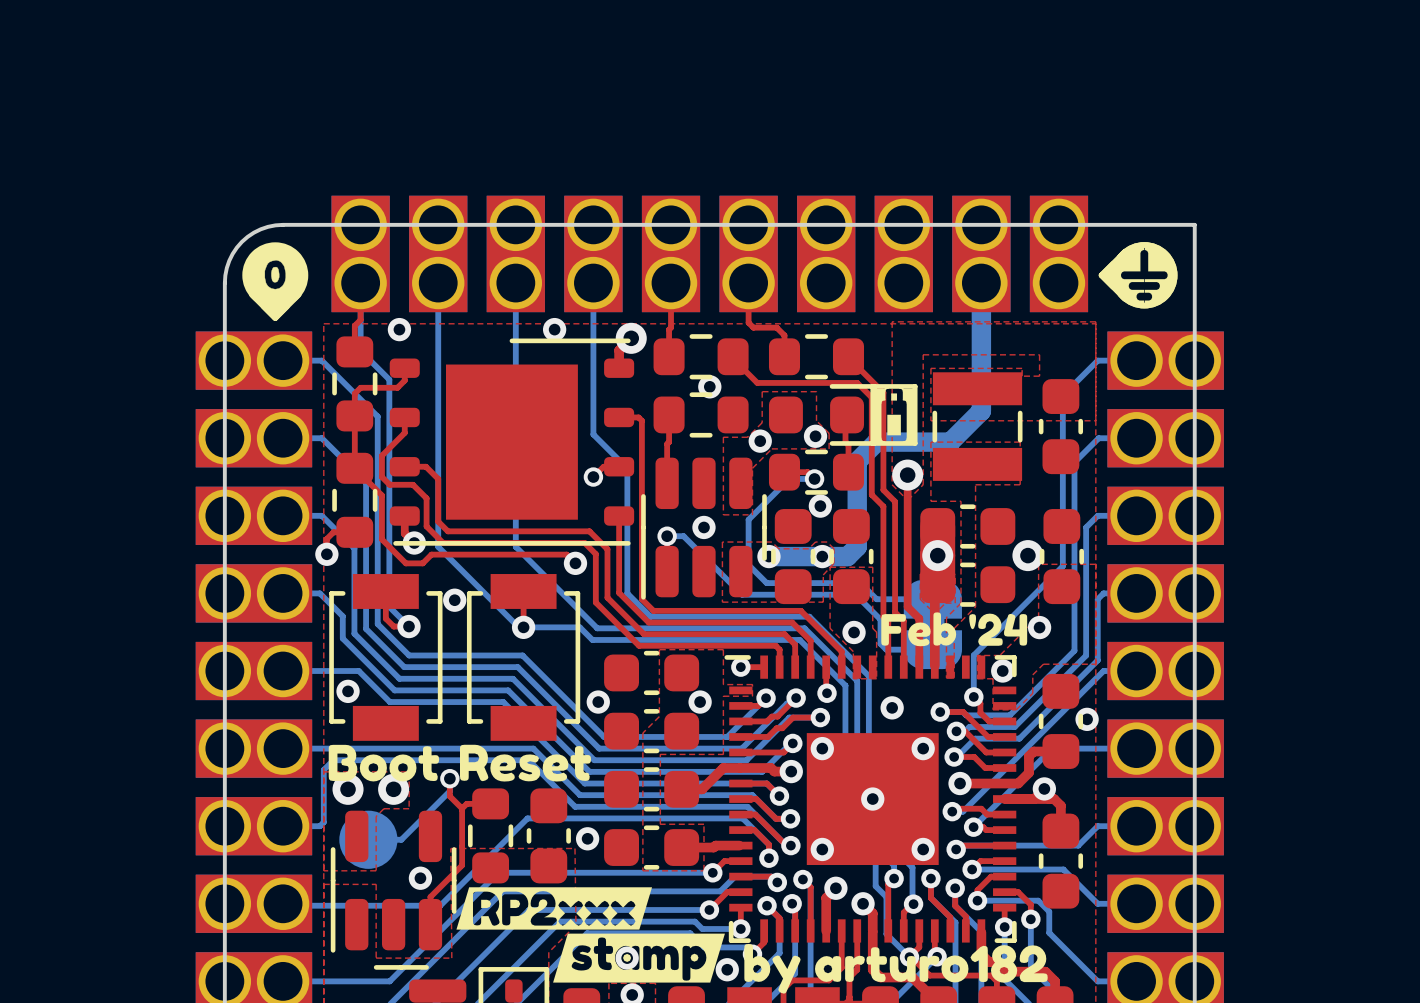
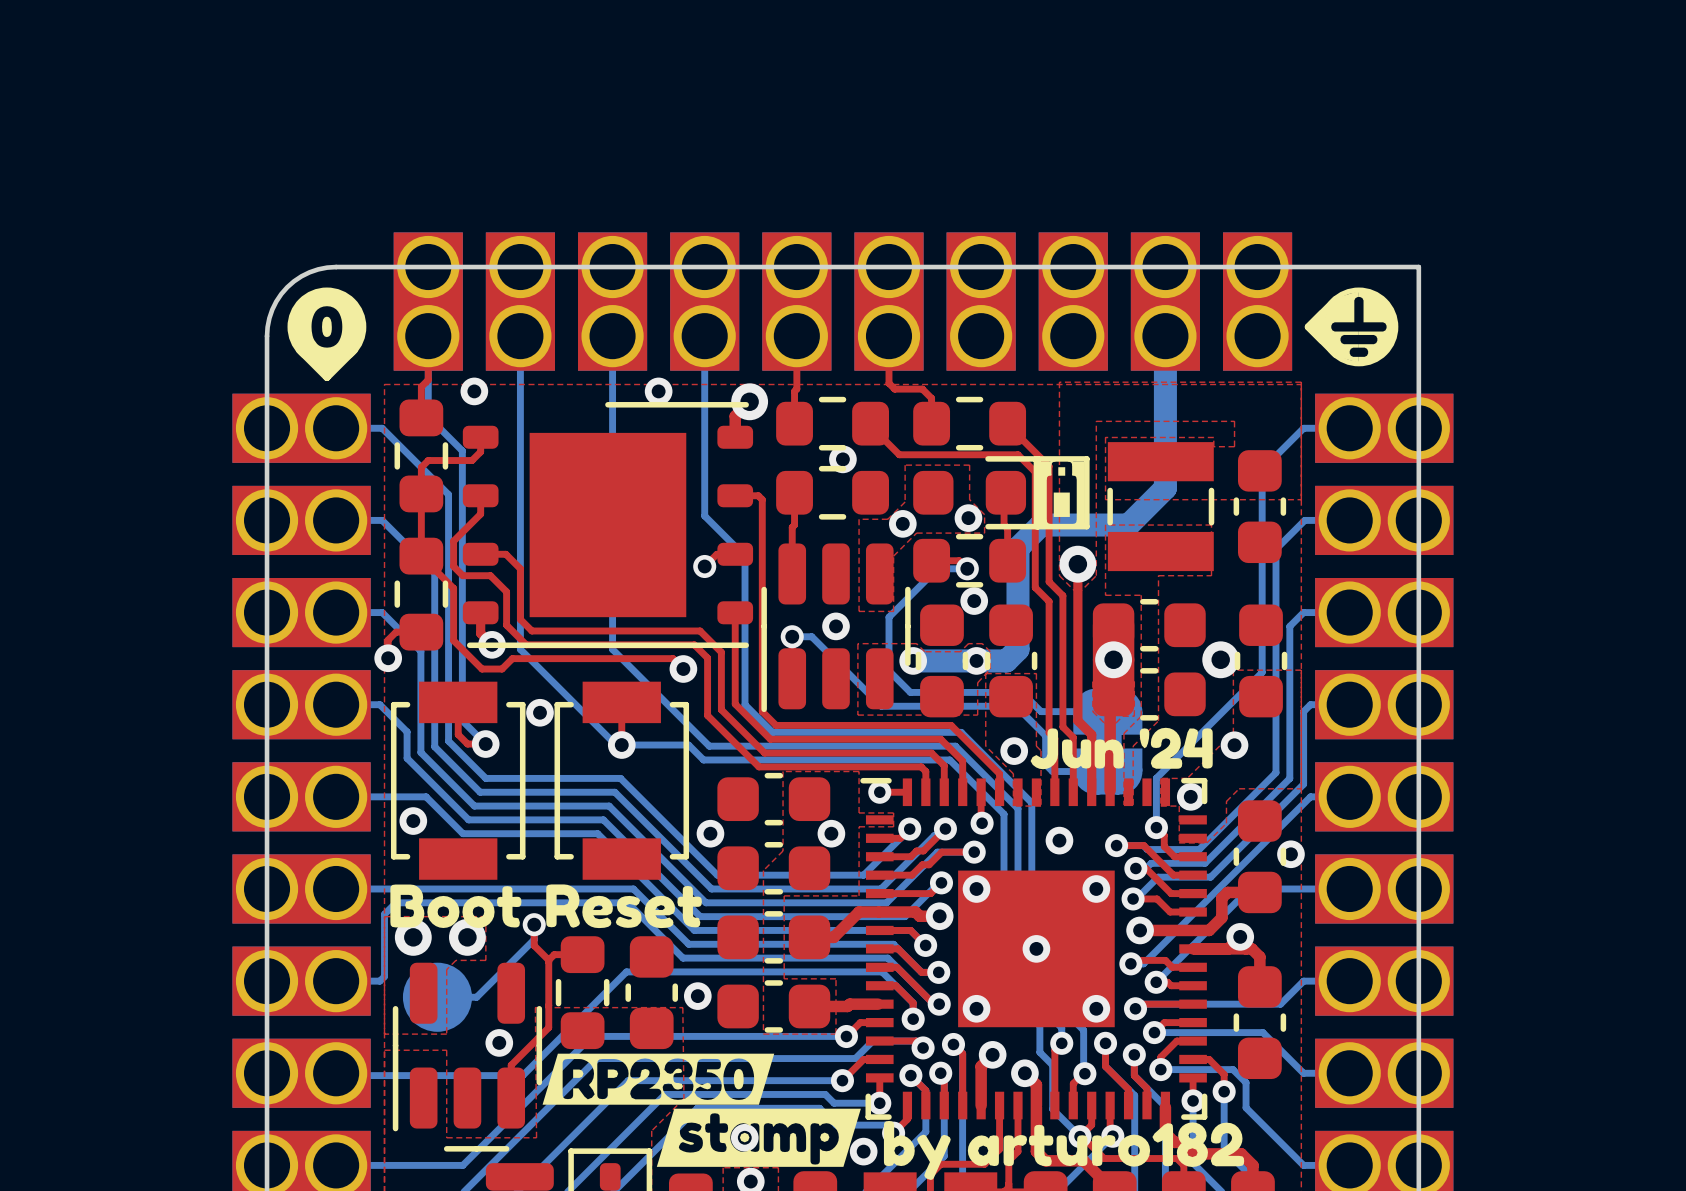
drawing: [242, 242, 309, 321] -> none
drawing: none -> [287, 287, 367, 379]
drawing: [1111, 242, 1178, 309] -> none
drawing: none -> [1322, 290, 1399, 363]
drawing shape: [881, 612, 1028, 647] -> [1030, 727, 1213, 770]
drawing shape: [456, 887, 653, 930] -> [542, 1053, 775, 1105]

